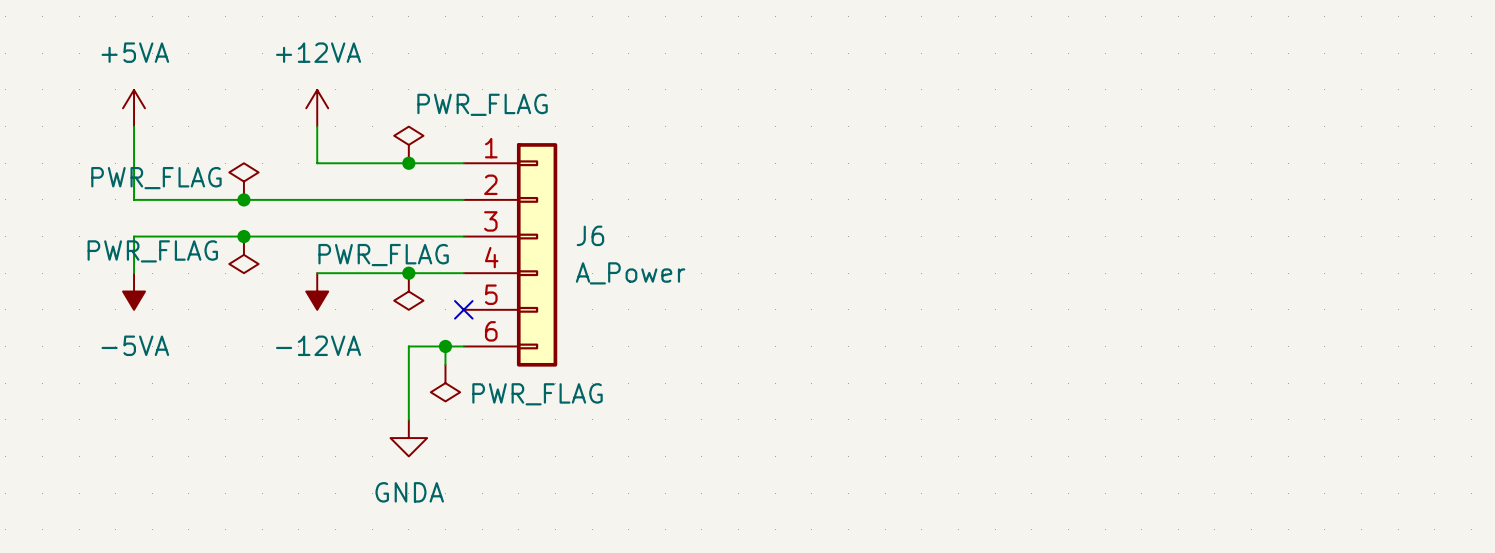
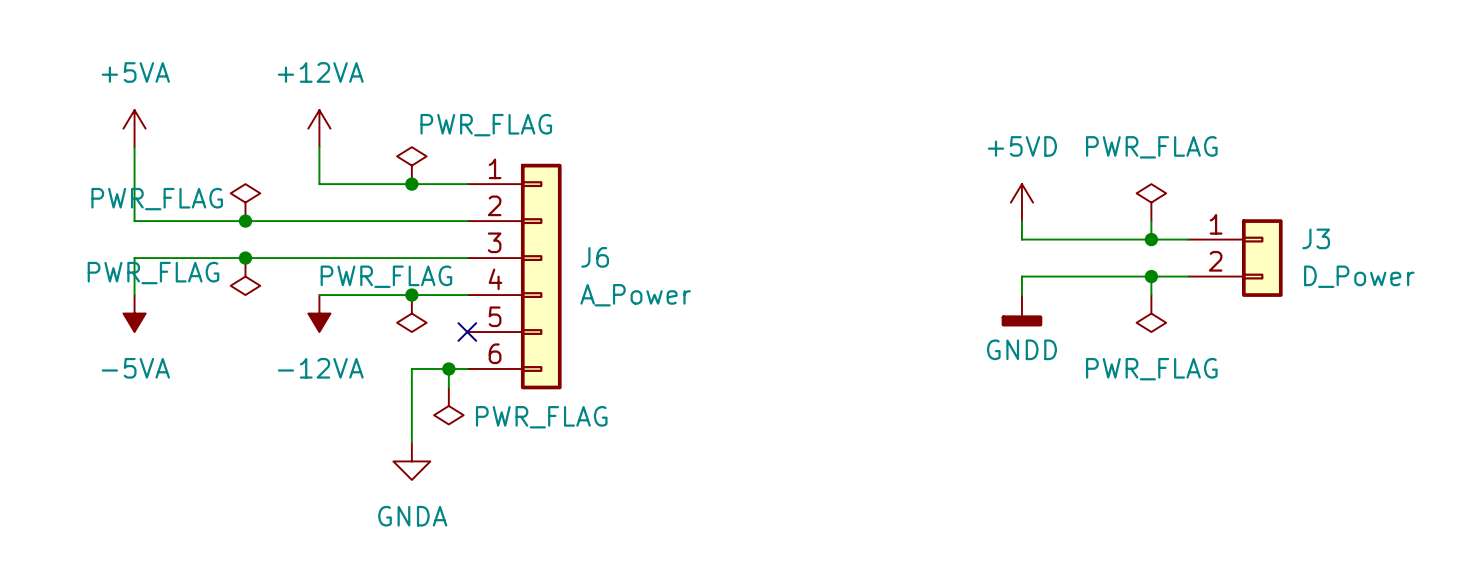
power symbol: none -> +5VD (1021, 202)
power symbol: none -> PWR_FLAG (1151, 202)
wire: none -> (1021, 221) (1021, 239) (1188, 239)
wire: none -> (1151, 221) (1151, 239)
junction: none -> (1151, 239)
J3: none -> D_Power (1235, 258)
wire: none -> (1151, 276) (1151, 295)
junction: none -> (1151, 276)
wire: none -> (1188, 276) (1021, 276) (1021, 295)
power symbol: none -> GNDD (1021, 310)
power symbol: none -> PWR_FLAG (1151, 313)

